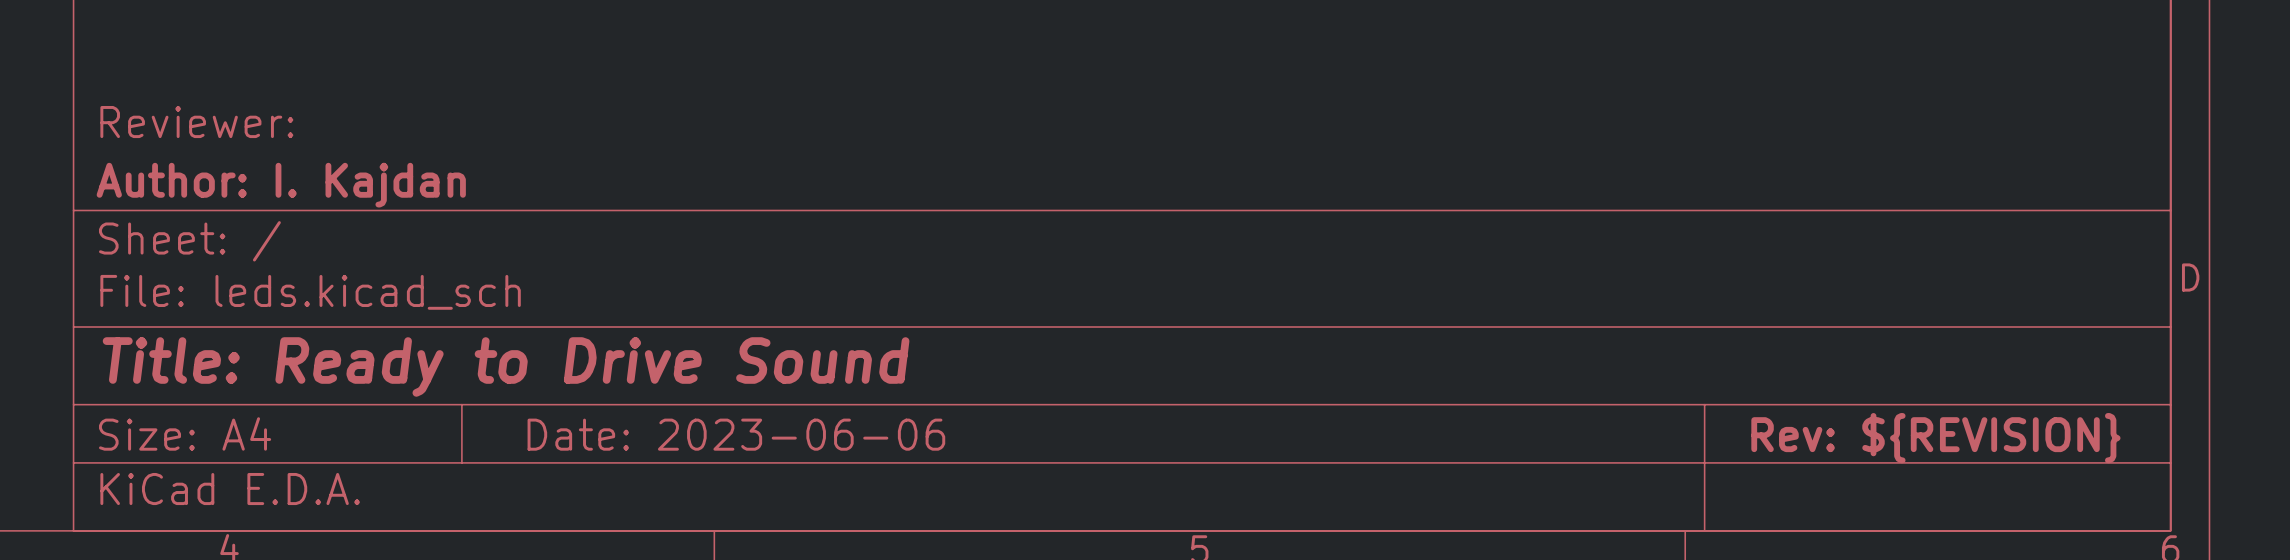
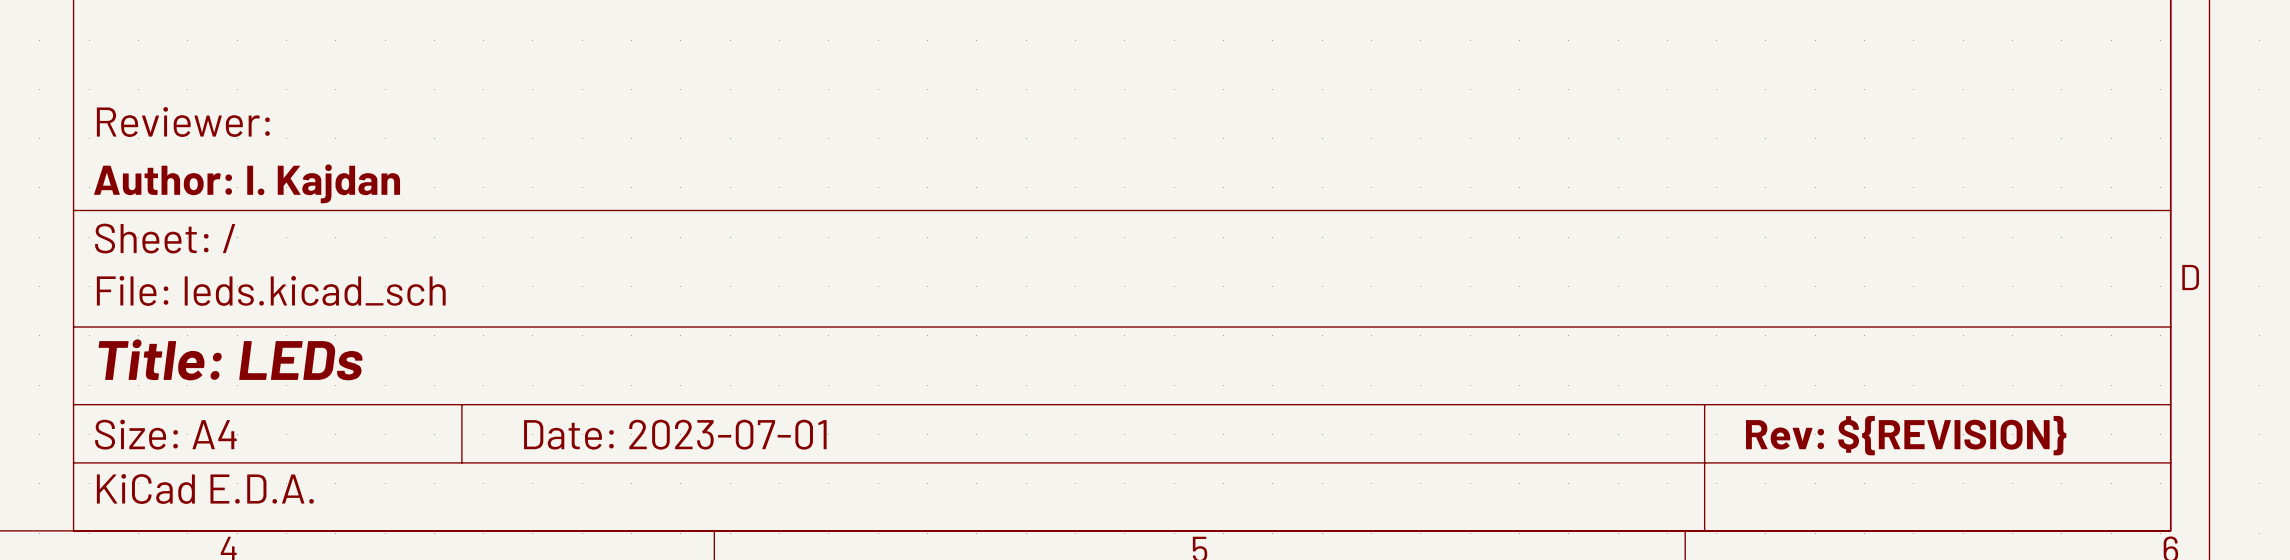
title block: Title: Ready to Drive Sound (506, 366) -> Title: LEDs (230, 359)
title block: Date: 2023-06-06 (736, 434) -> Date: 2023-07-01 (675, 434)

